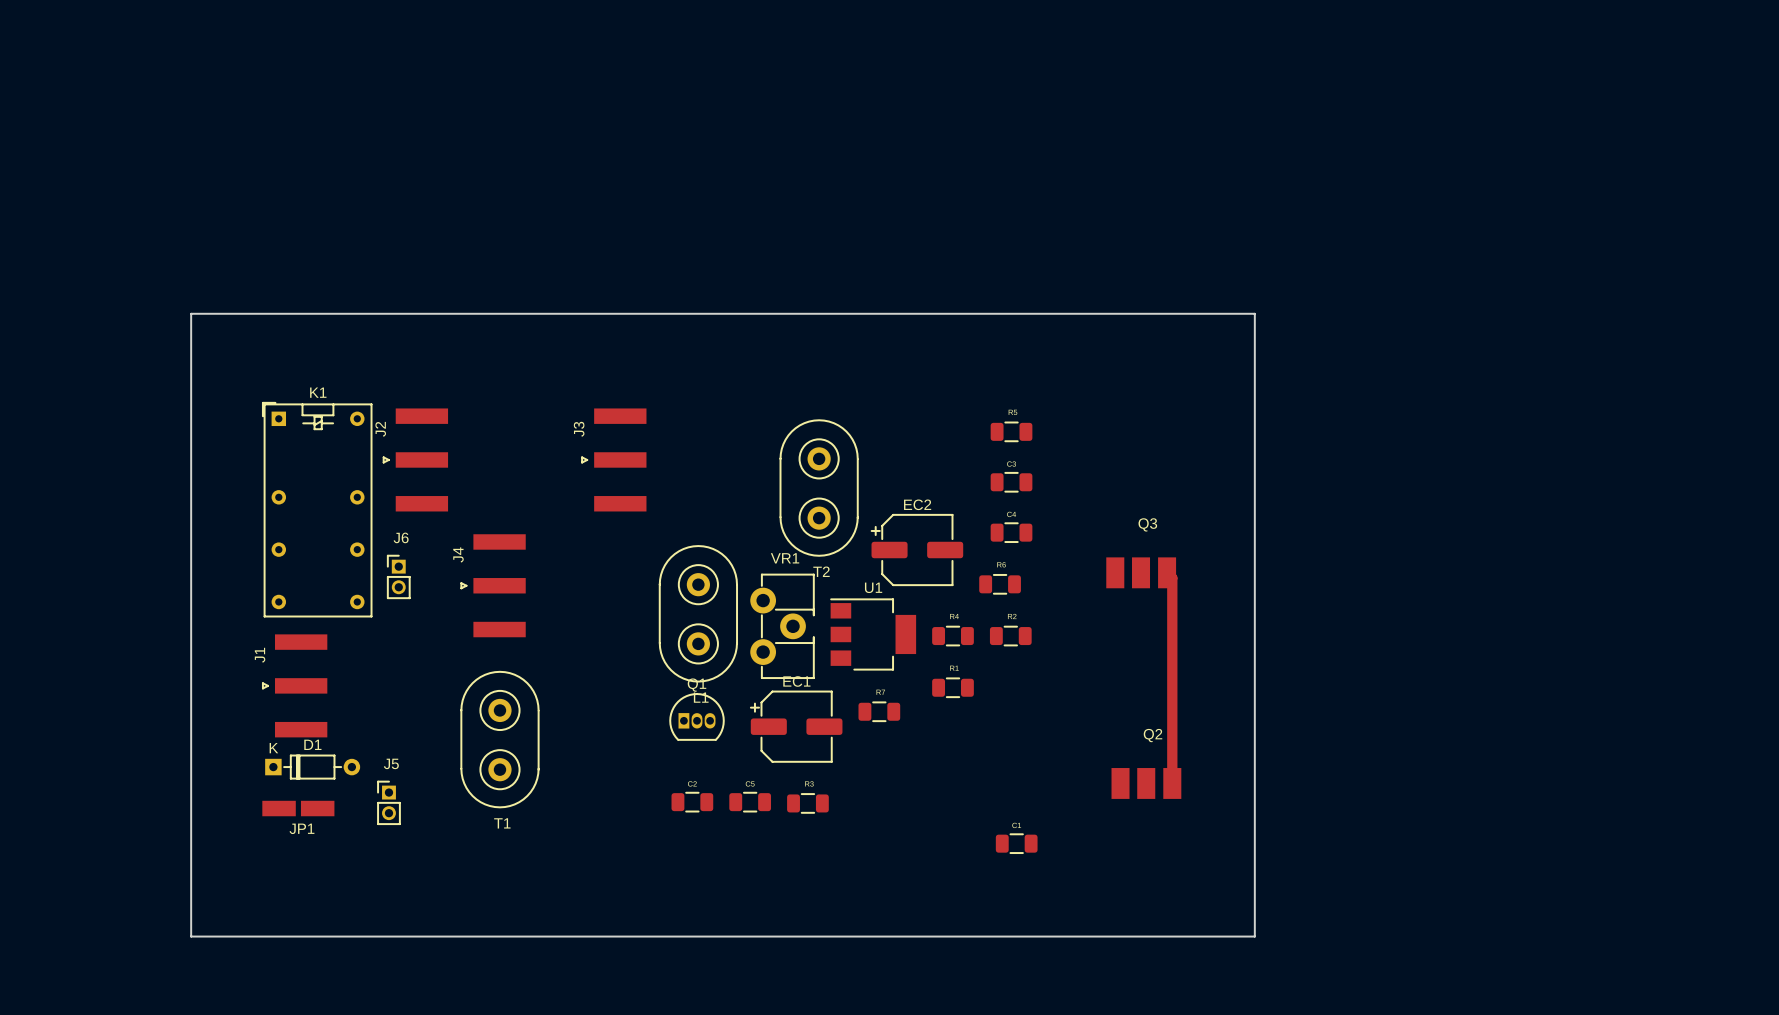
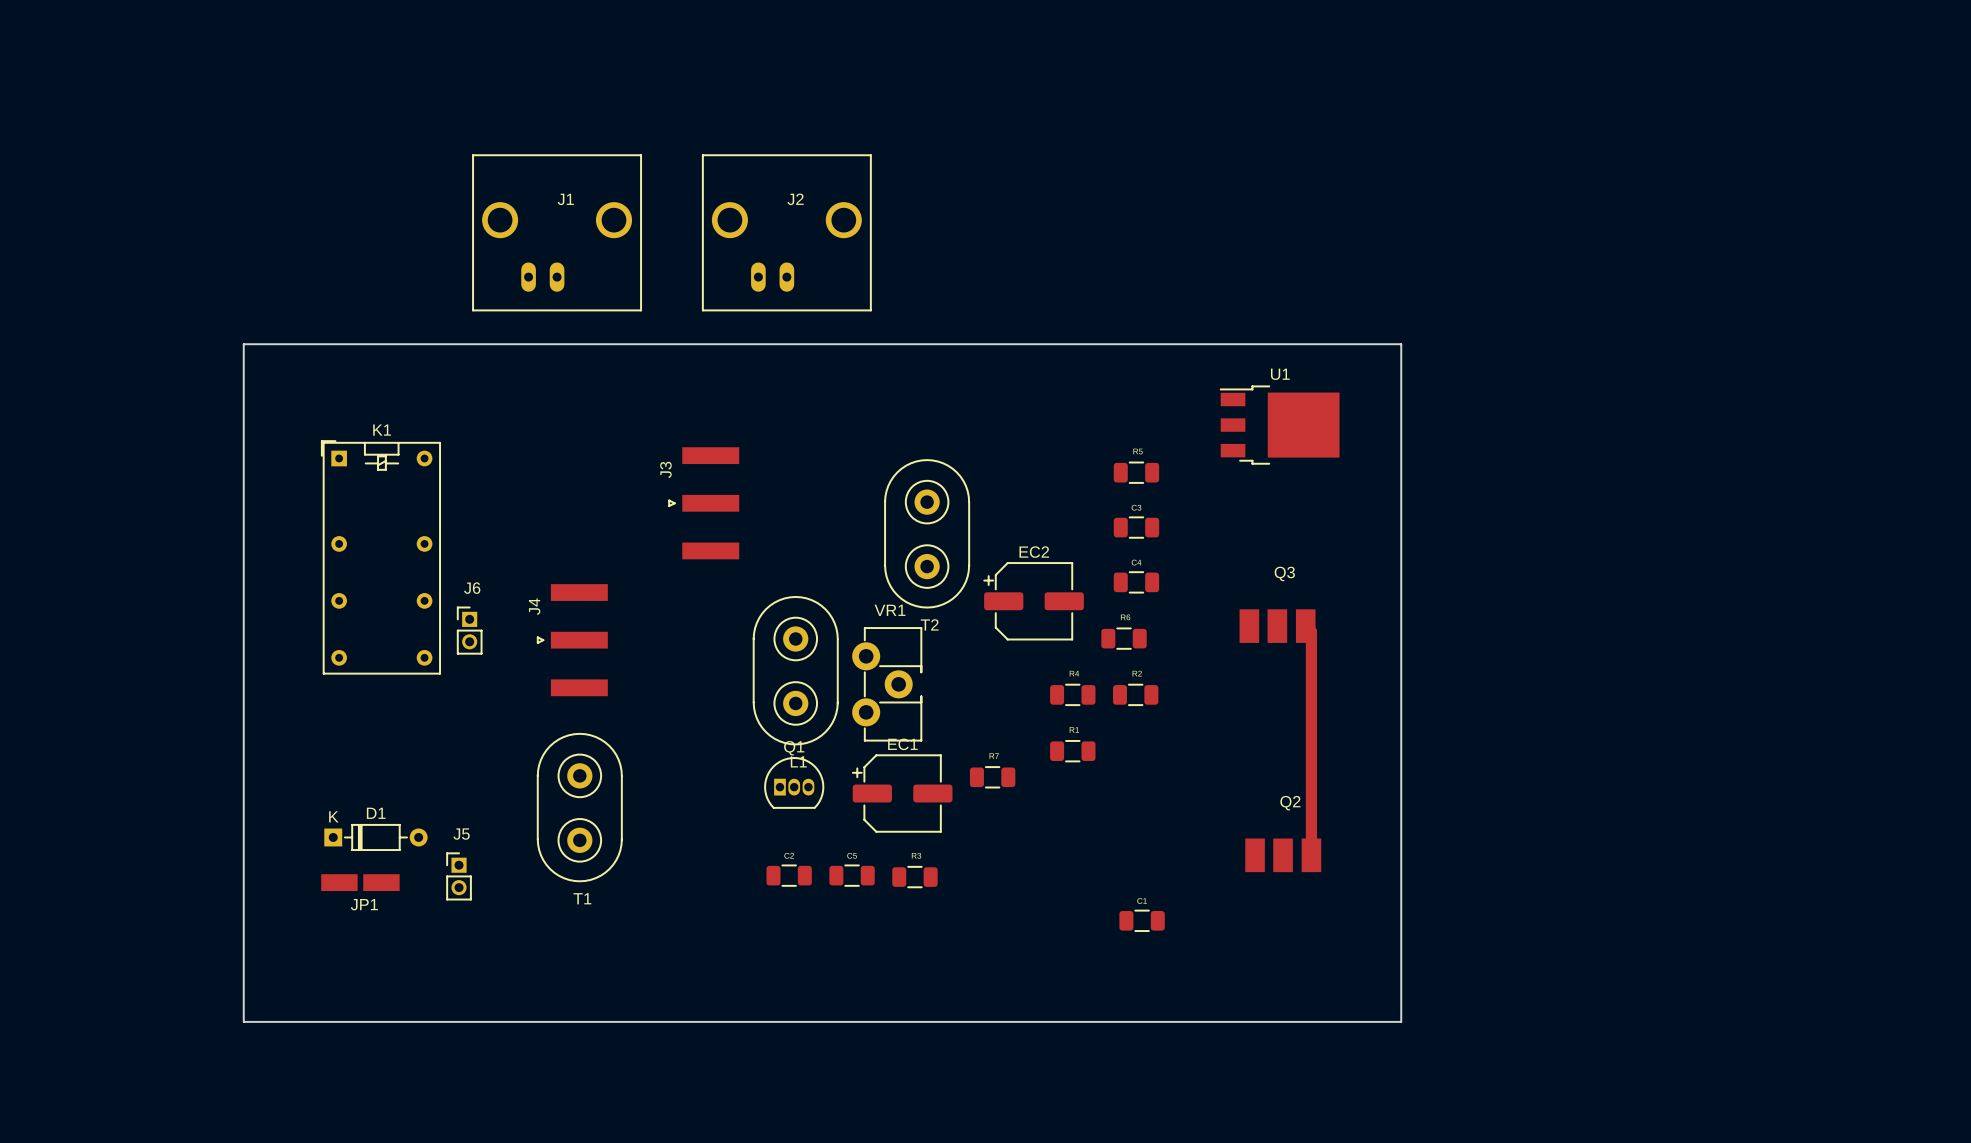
J2 footprint: [383, 408, 449, 512] -> [702, 154, 872, 312]
J2 name position: J2 (380, 429) -> J2 (795, 199)
U1 footprint: [830, 598, 917, 671] -> [1220, 385, 1340, 465]
J1 footprint: [262, 634, 328, 738] -> [472, 154, 642, 312]
J1 name position: J1 (260, 655) -> J1 (565, 199)

